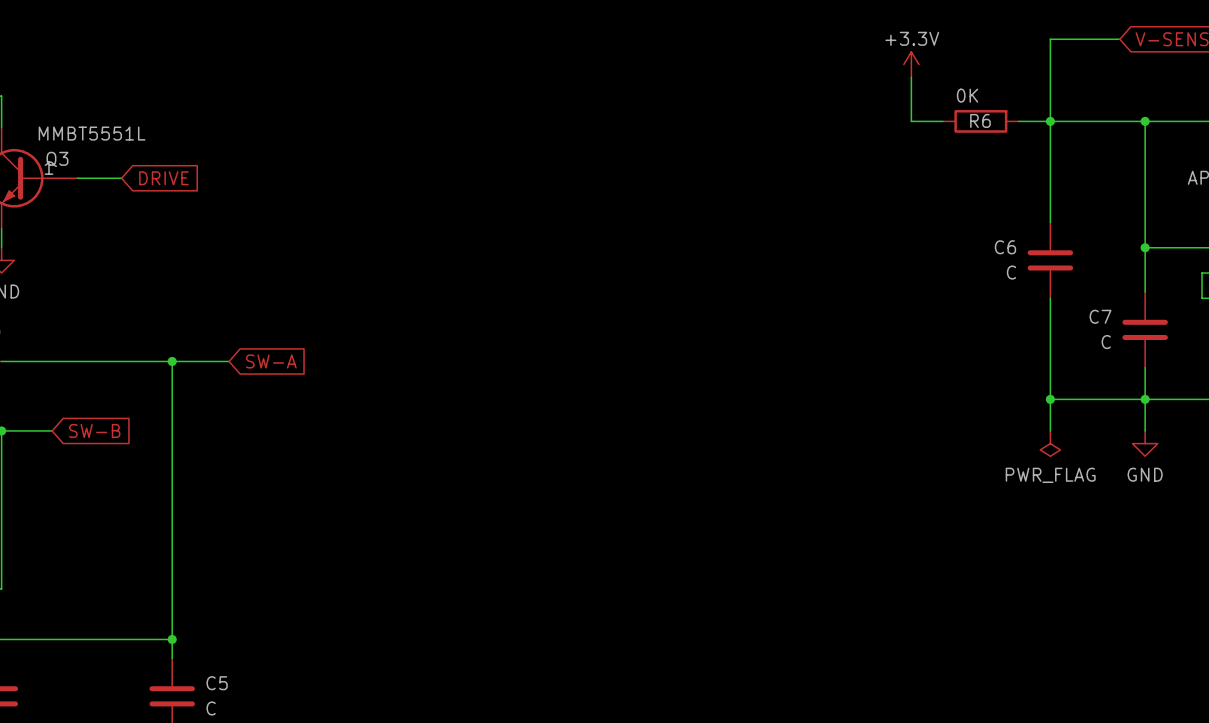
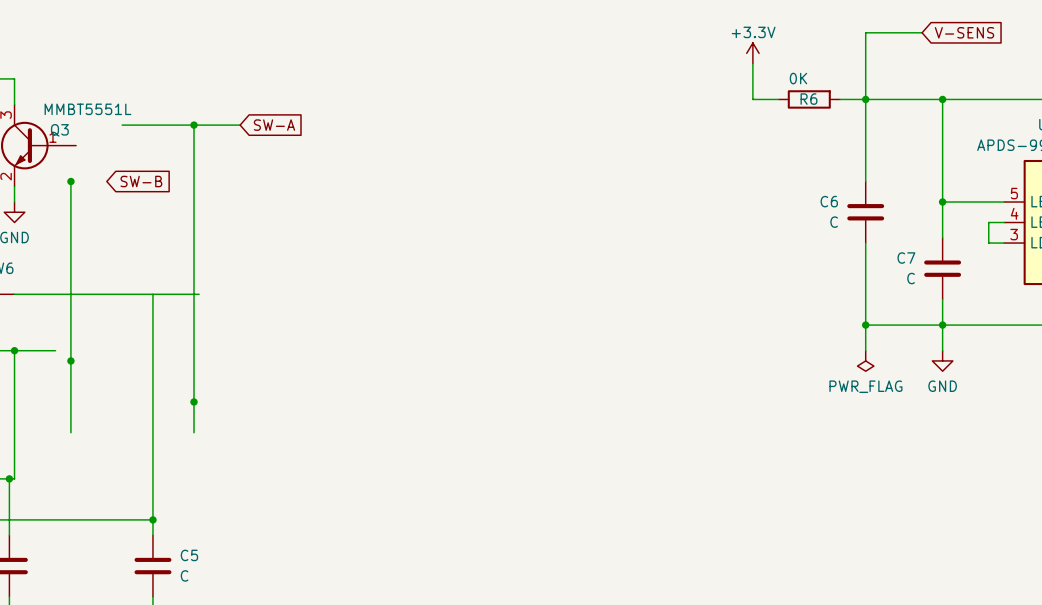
wire: none -> (122, 125) (240, 125)
wire: none -> (194, 125) (194, 432)
junction: none -> (194, 125)
wire: (77, 178) (121, 178) -> none
global label: DRIVE (163, 178) -> none
wire: none -> (70, 181) (70, 432)
junction: none -> (70, 181)
junction: (172, 361) -> none
global label position: SW-A (271, 361) -> SW-A (274, 125)
global label position: SW-B (94, 430) -> SW-B (141, 181)
junction: none -> (70, 360)
junction: none -> (194, 401)

